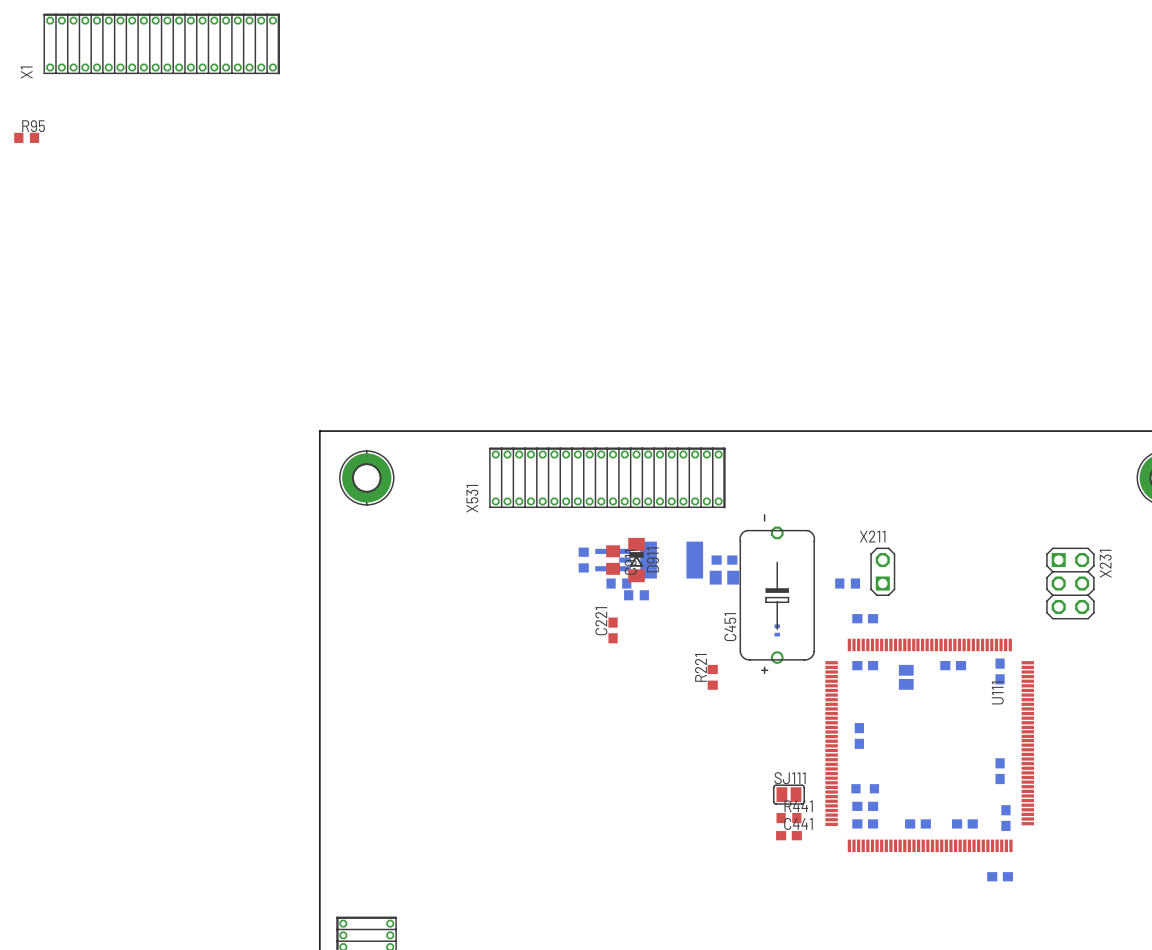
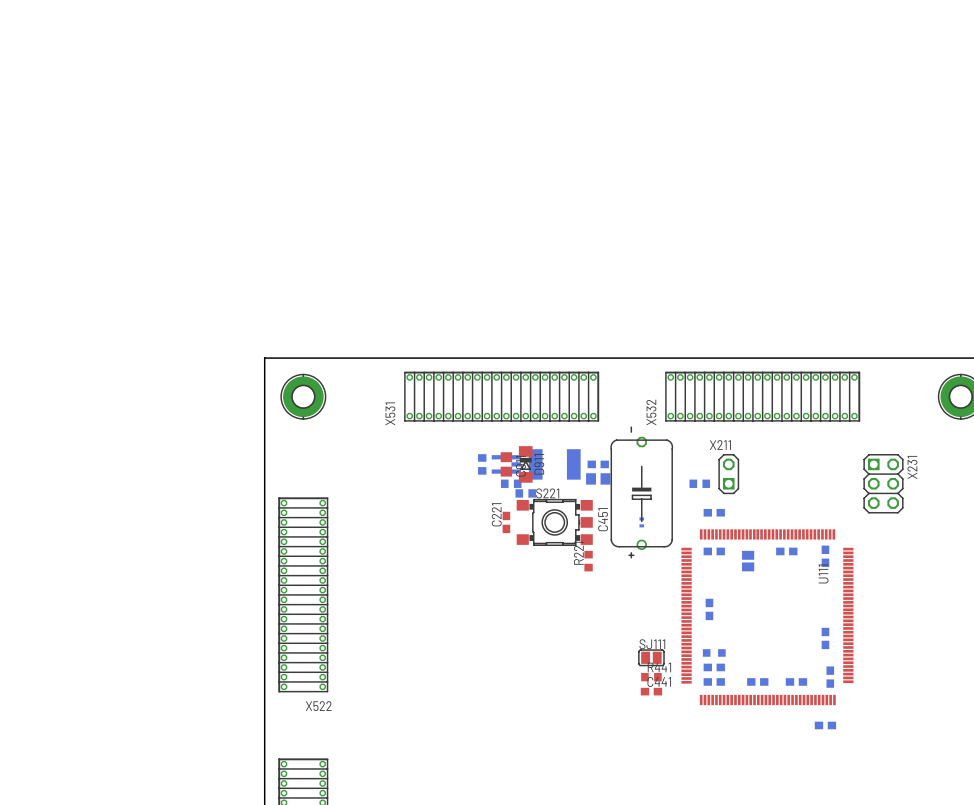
X1: (161, 44) -> none
R95: (26, 137) -> none
X532: none -> (762, 396)
S221: none -> (554, 522)
X522: none -> (303, 594)

